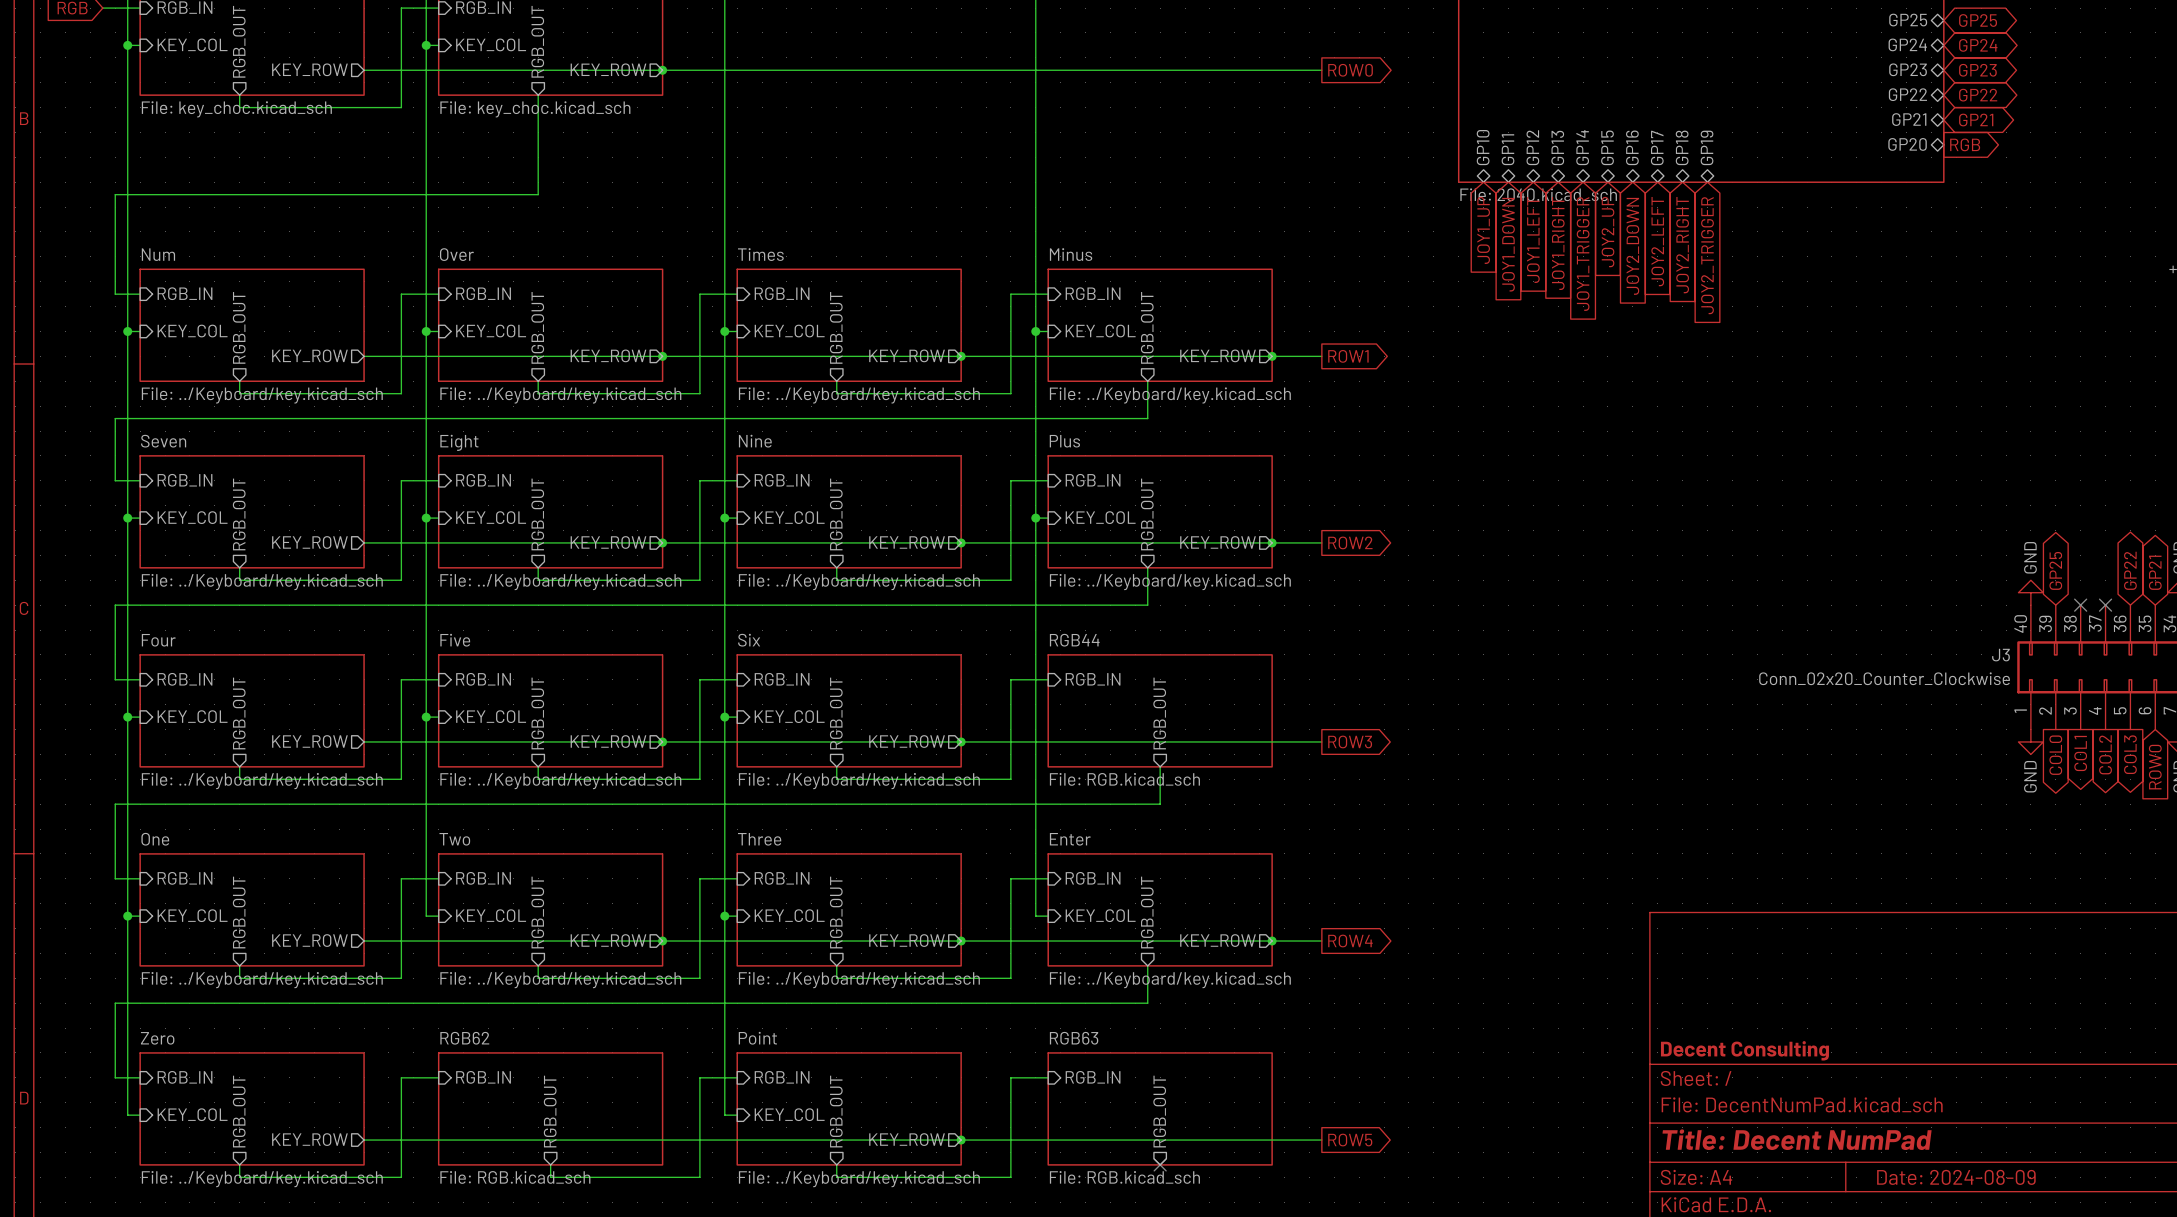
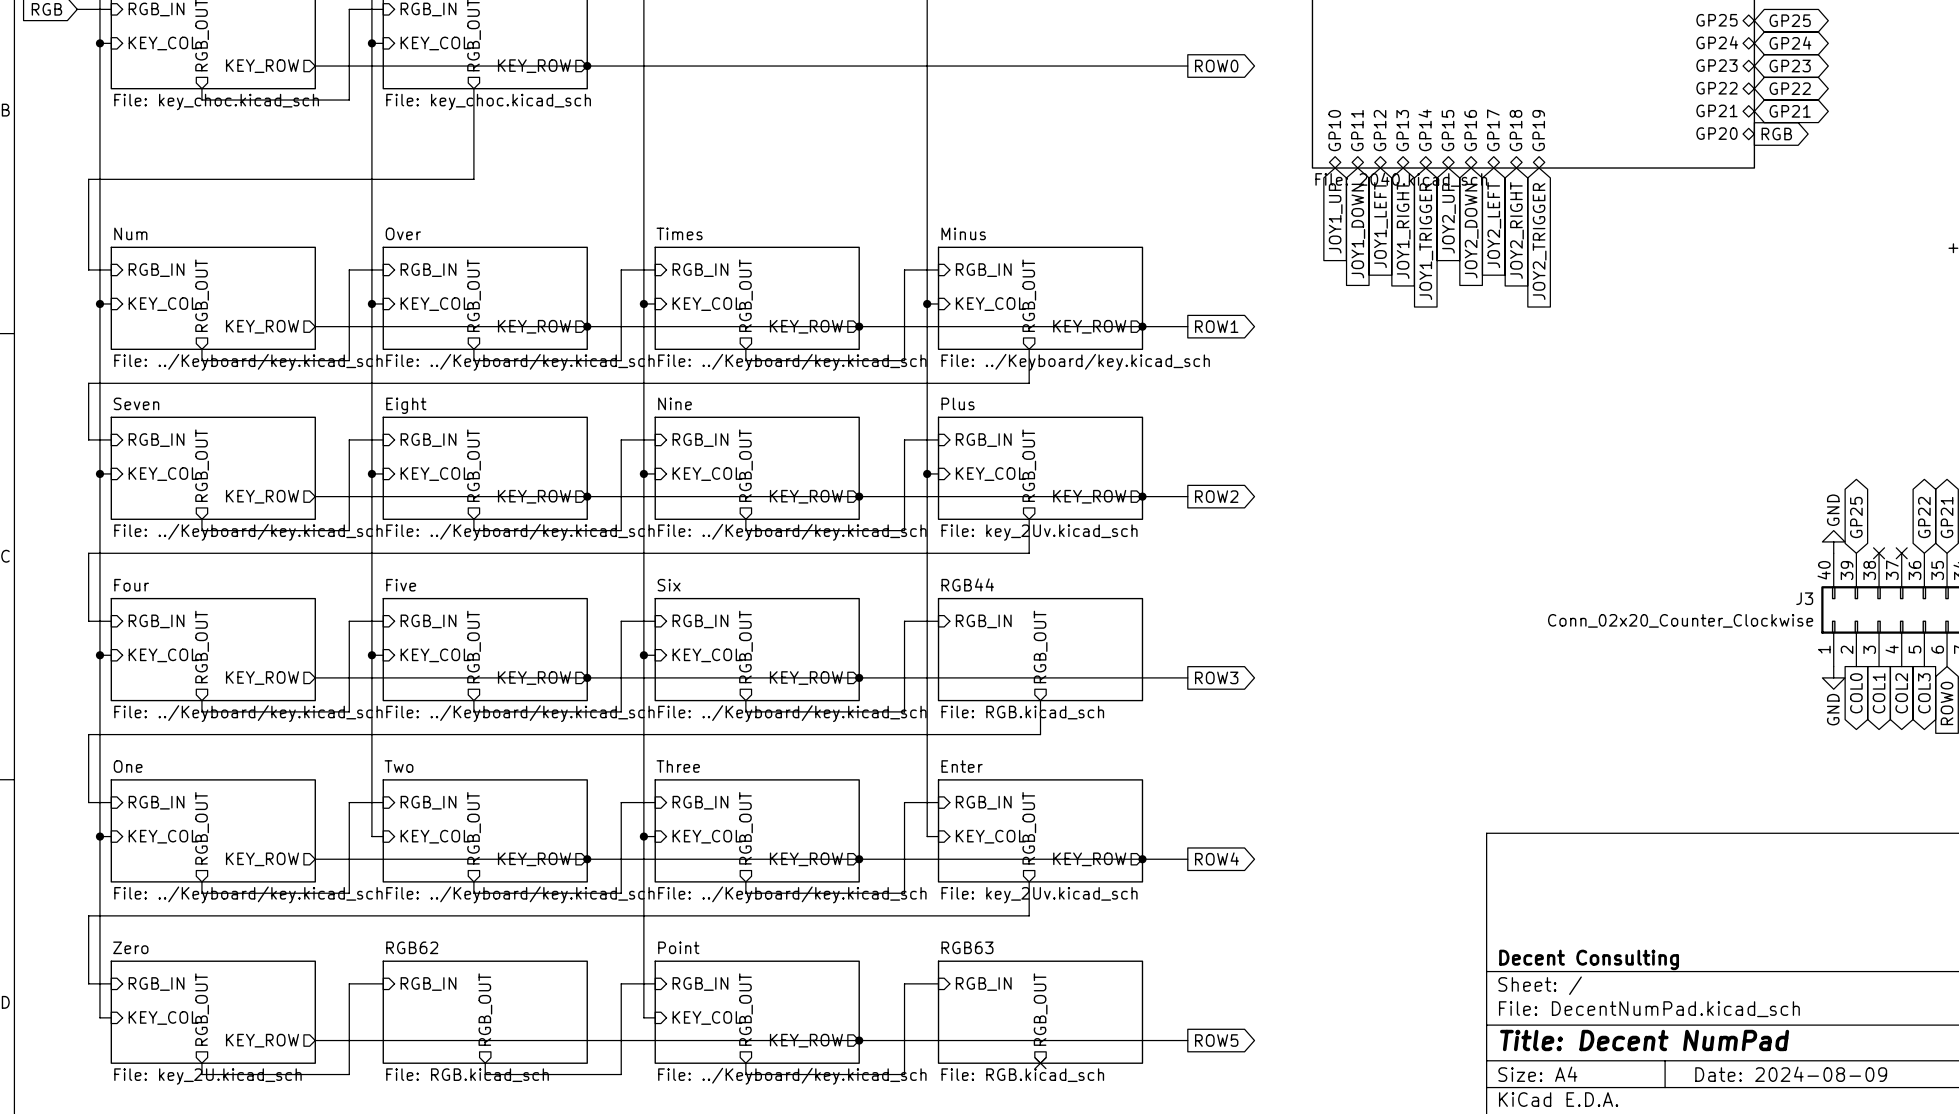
sheet Plus value: File: ../Keyboard/key.kicad_sch (1170, 582) -> File: key_2Uv.kicad_sch (1039, 532)
sheet Enter value: File: ../Keyboard/key.kicad_sch (1170, 980) -> File: key_2Uv.kicad_sch (1039, 895)
sheet Zero value: File: ../Keyboard/key.kicad_sch (262, 1179) -> File: key_2U.kicad_sch (207, 1076)

